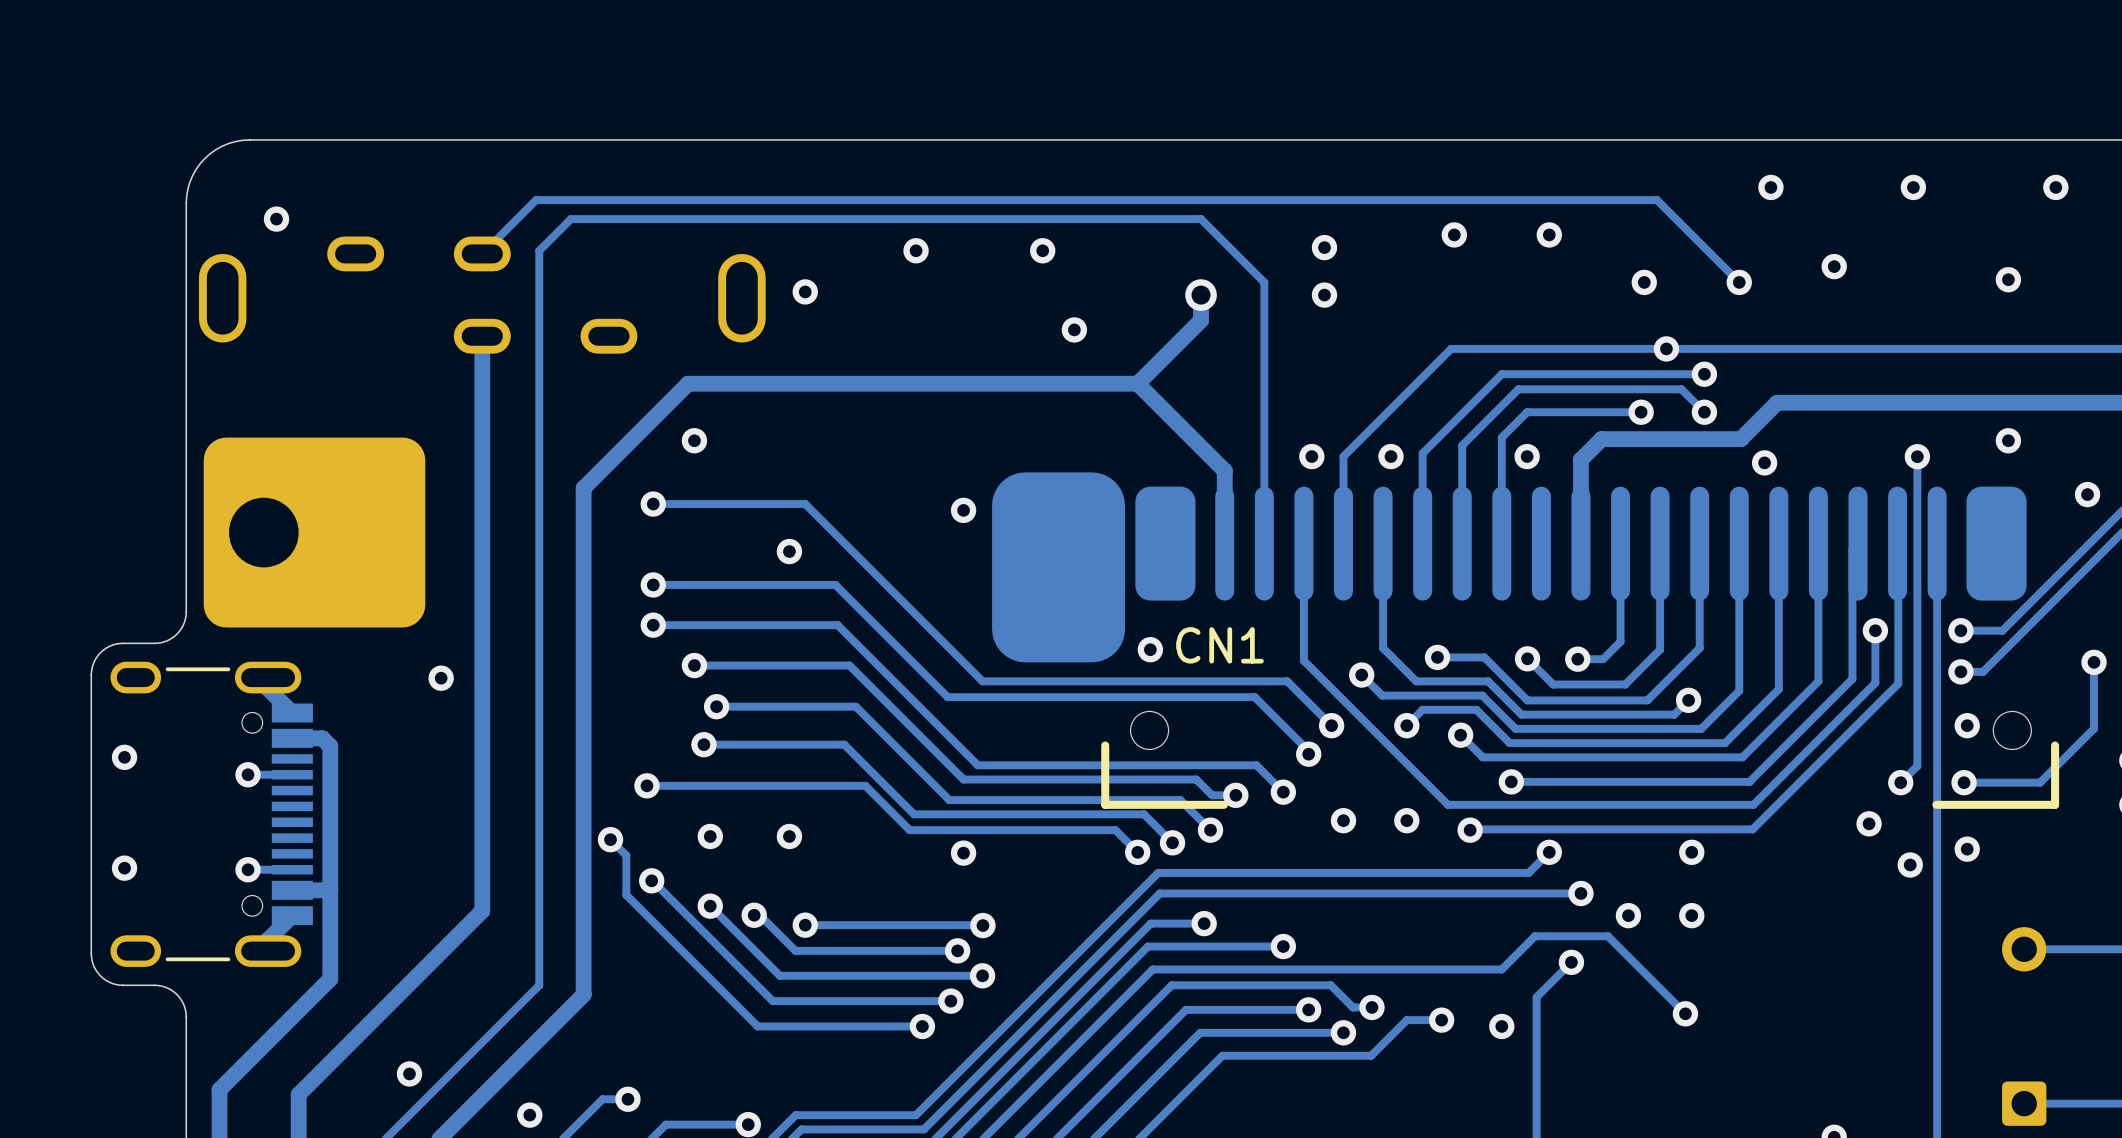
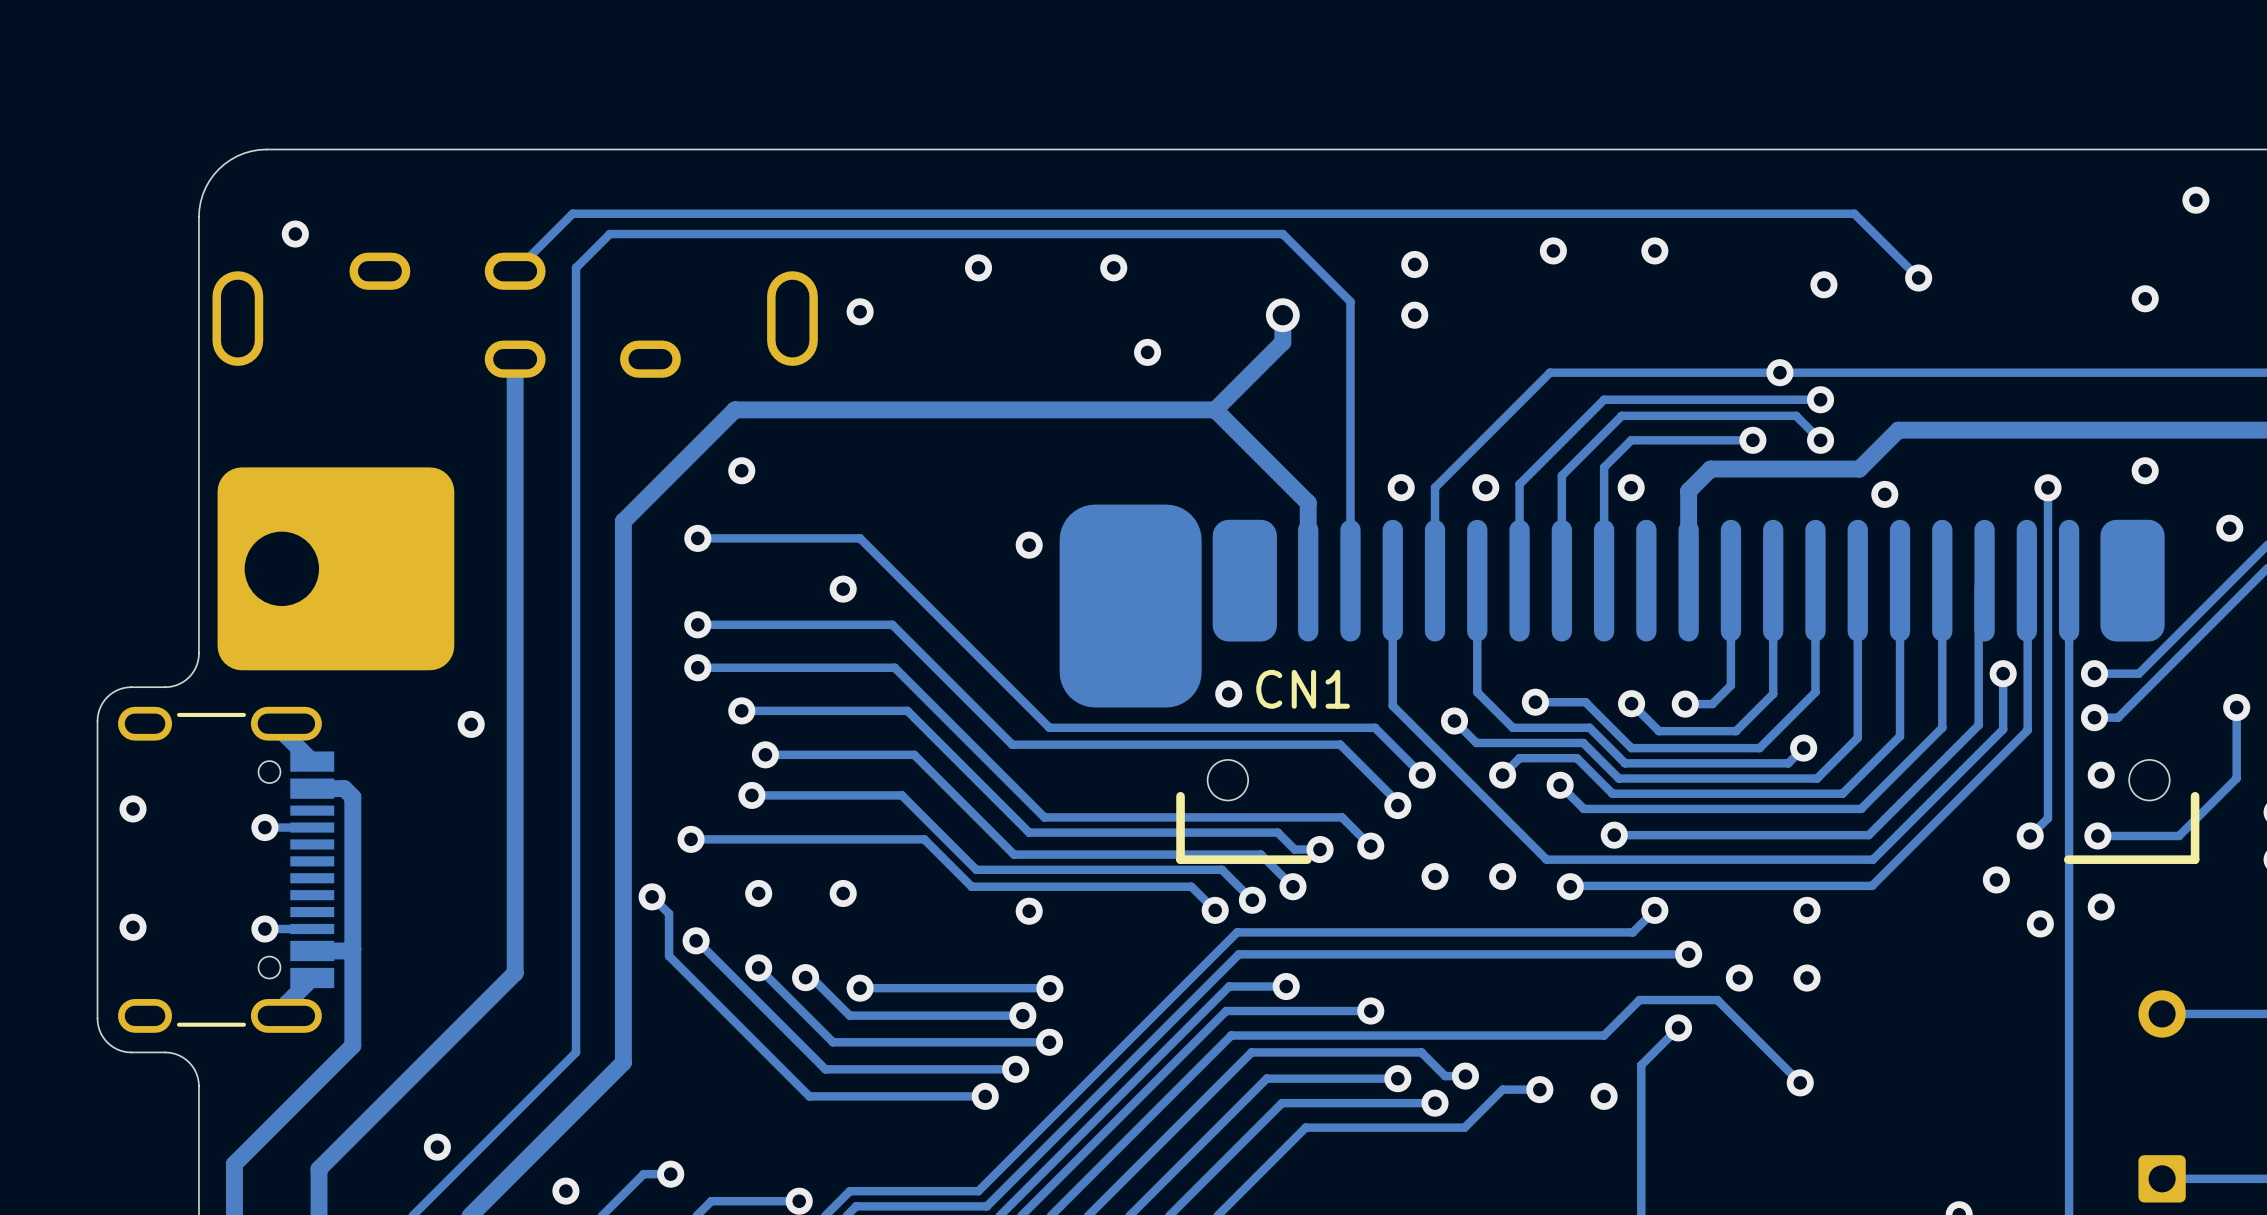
via: (1770, 187) -> none
via: (1913, 187) -> none
track: (1656, 200) (1739, 282) -> (1769, 213) (1854, 213) (1918, 277)
via: none -> (1918, 277)
via: none -> (1823, 284)
via: (1834, 266) -> none
via: (1644, 282) -> none
via: (1739, 282) -> none

